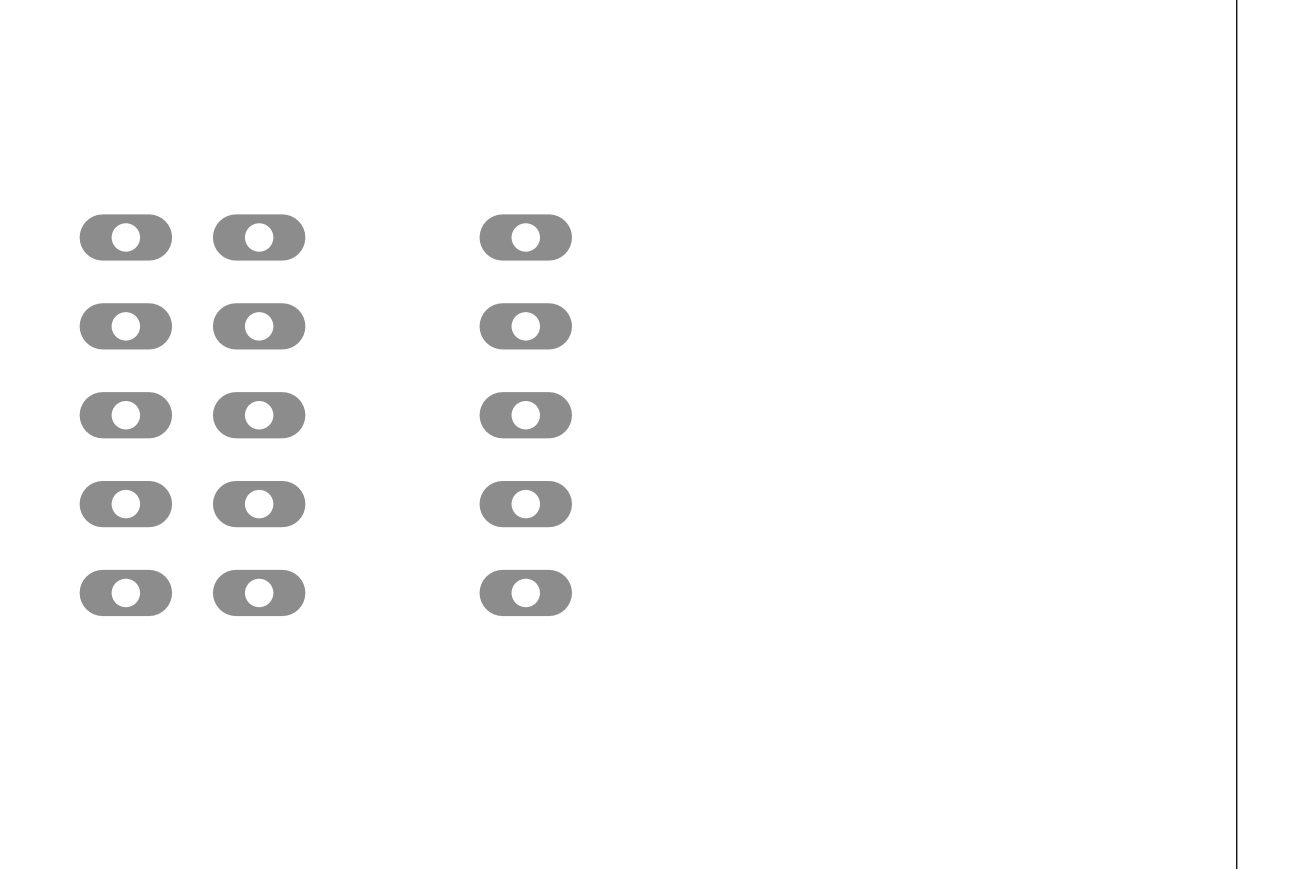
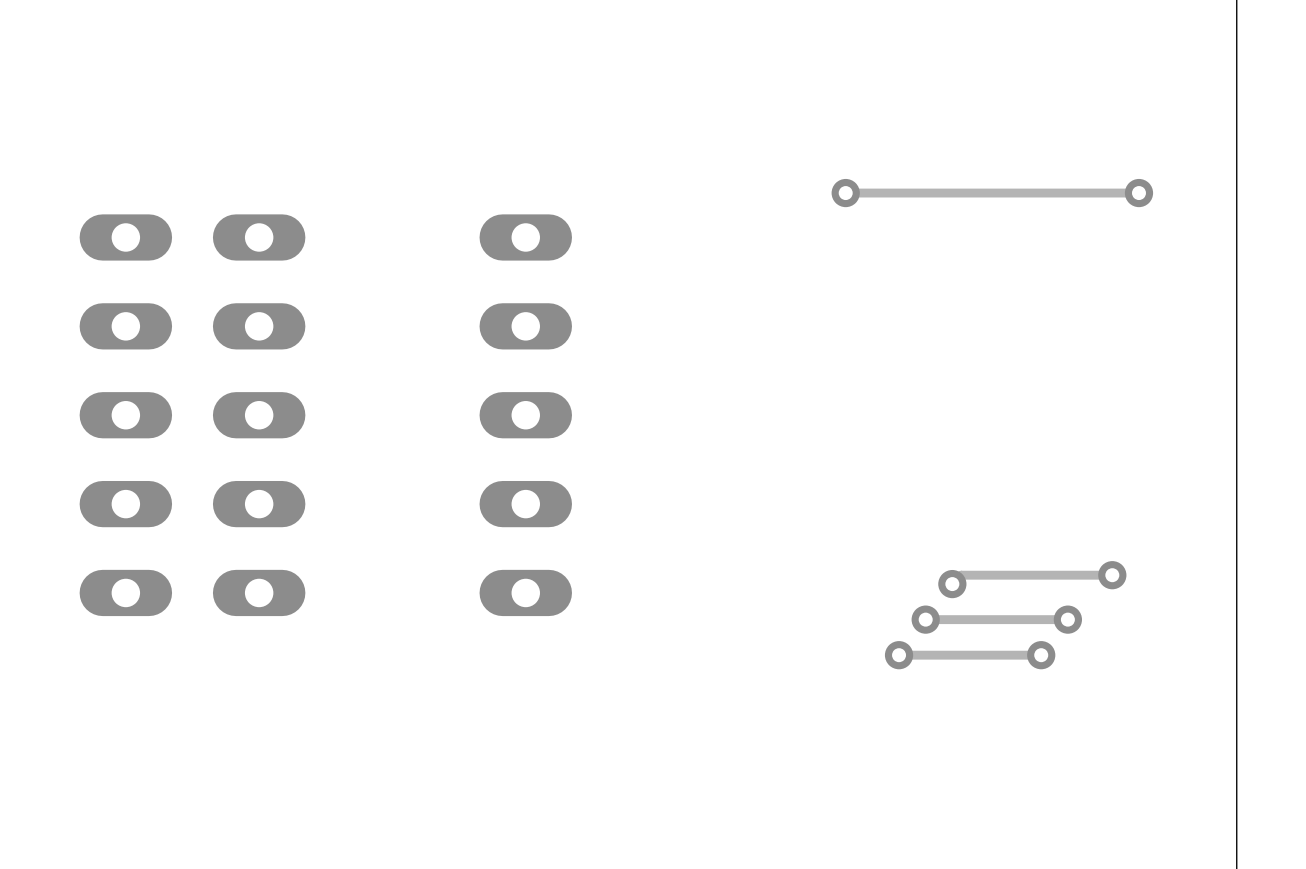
via: none -> (845, 193)
track: none -> (1138, 193) (845, 193)
via: none -> (1138, 193)
track: none -> (1112, 575) (961, 575) (952, 584)
via: none -> (1112, 575)
via: none -> (952, 584)
via: none -> (925, 619)
track: none -> (1067, 619) (925, 619)
via: none -> (1067, 619)
via: none -> (899, 655)
track: none -> (1041, 655) (899, 655)
via: none -> (1041, 655)

